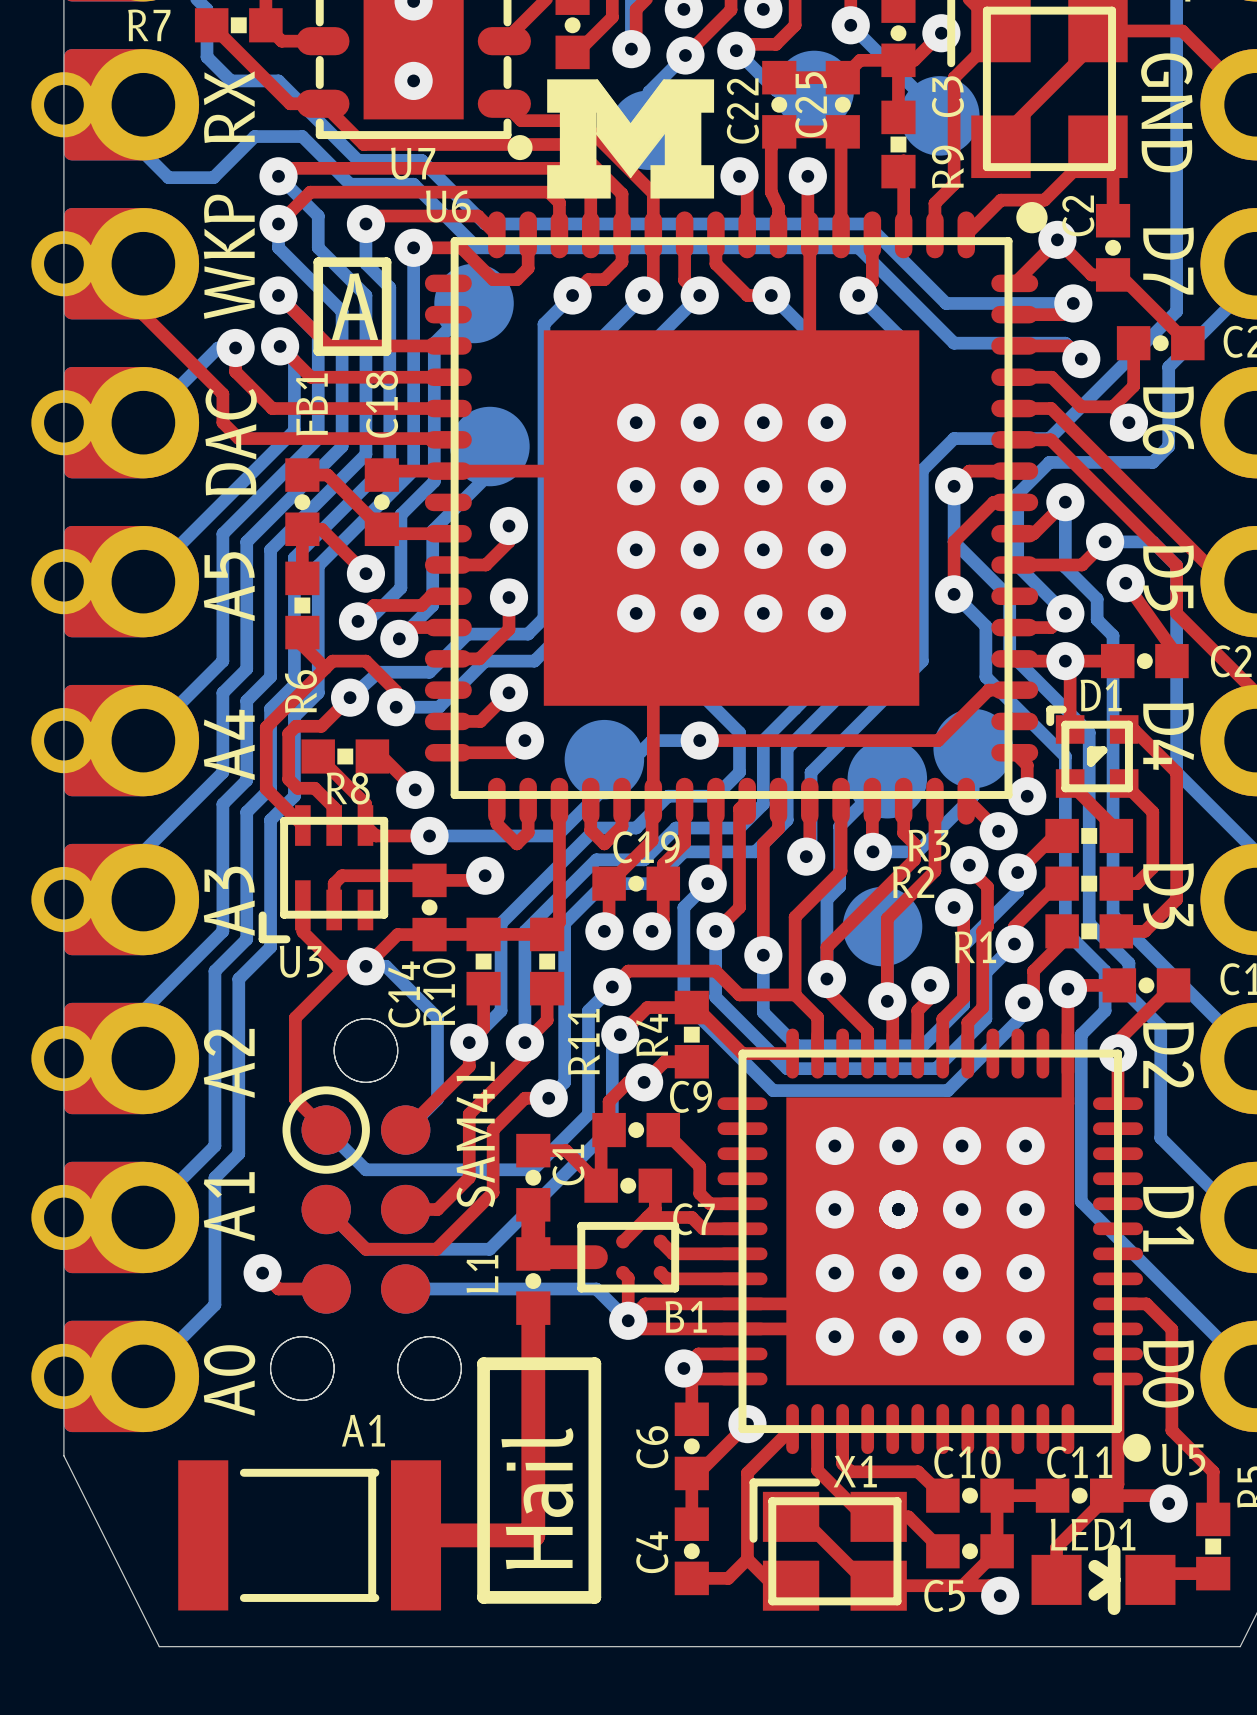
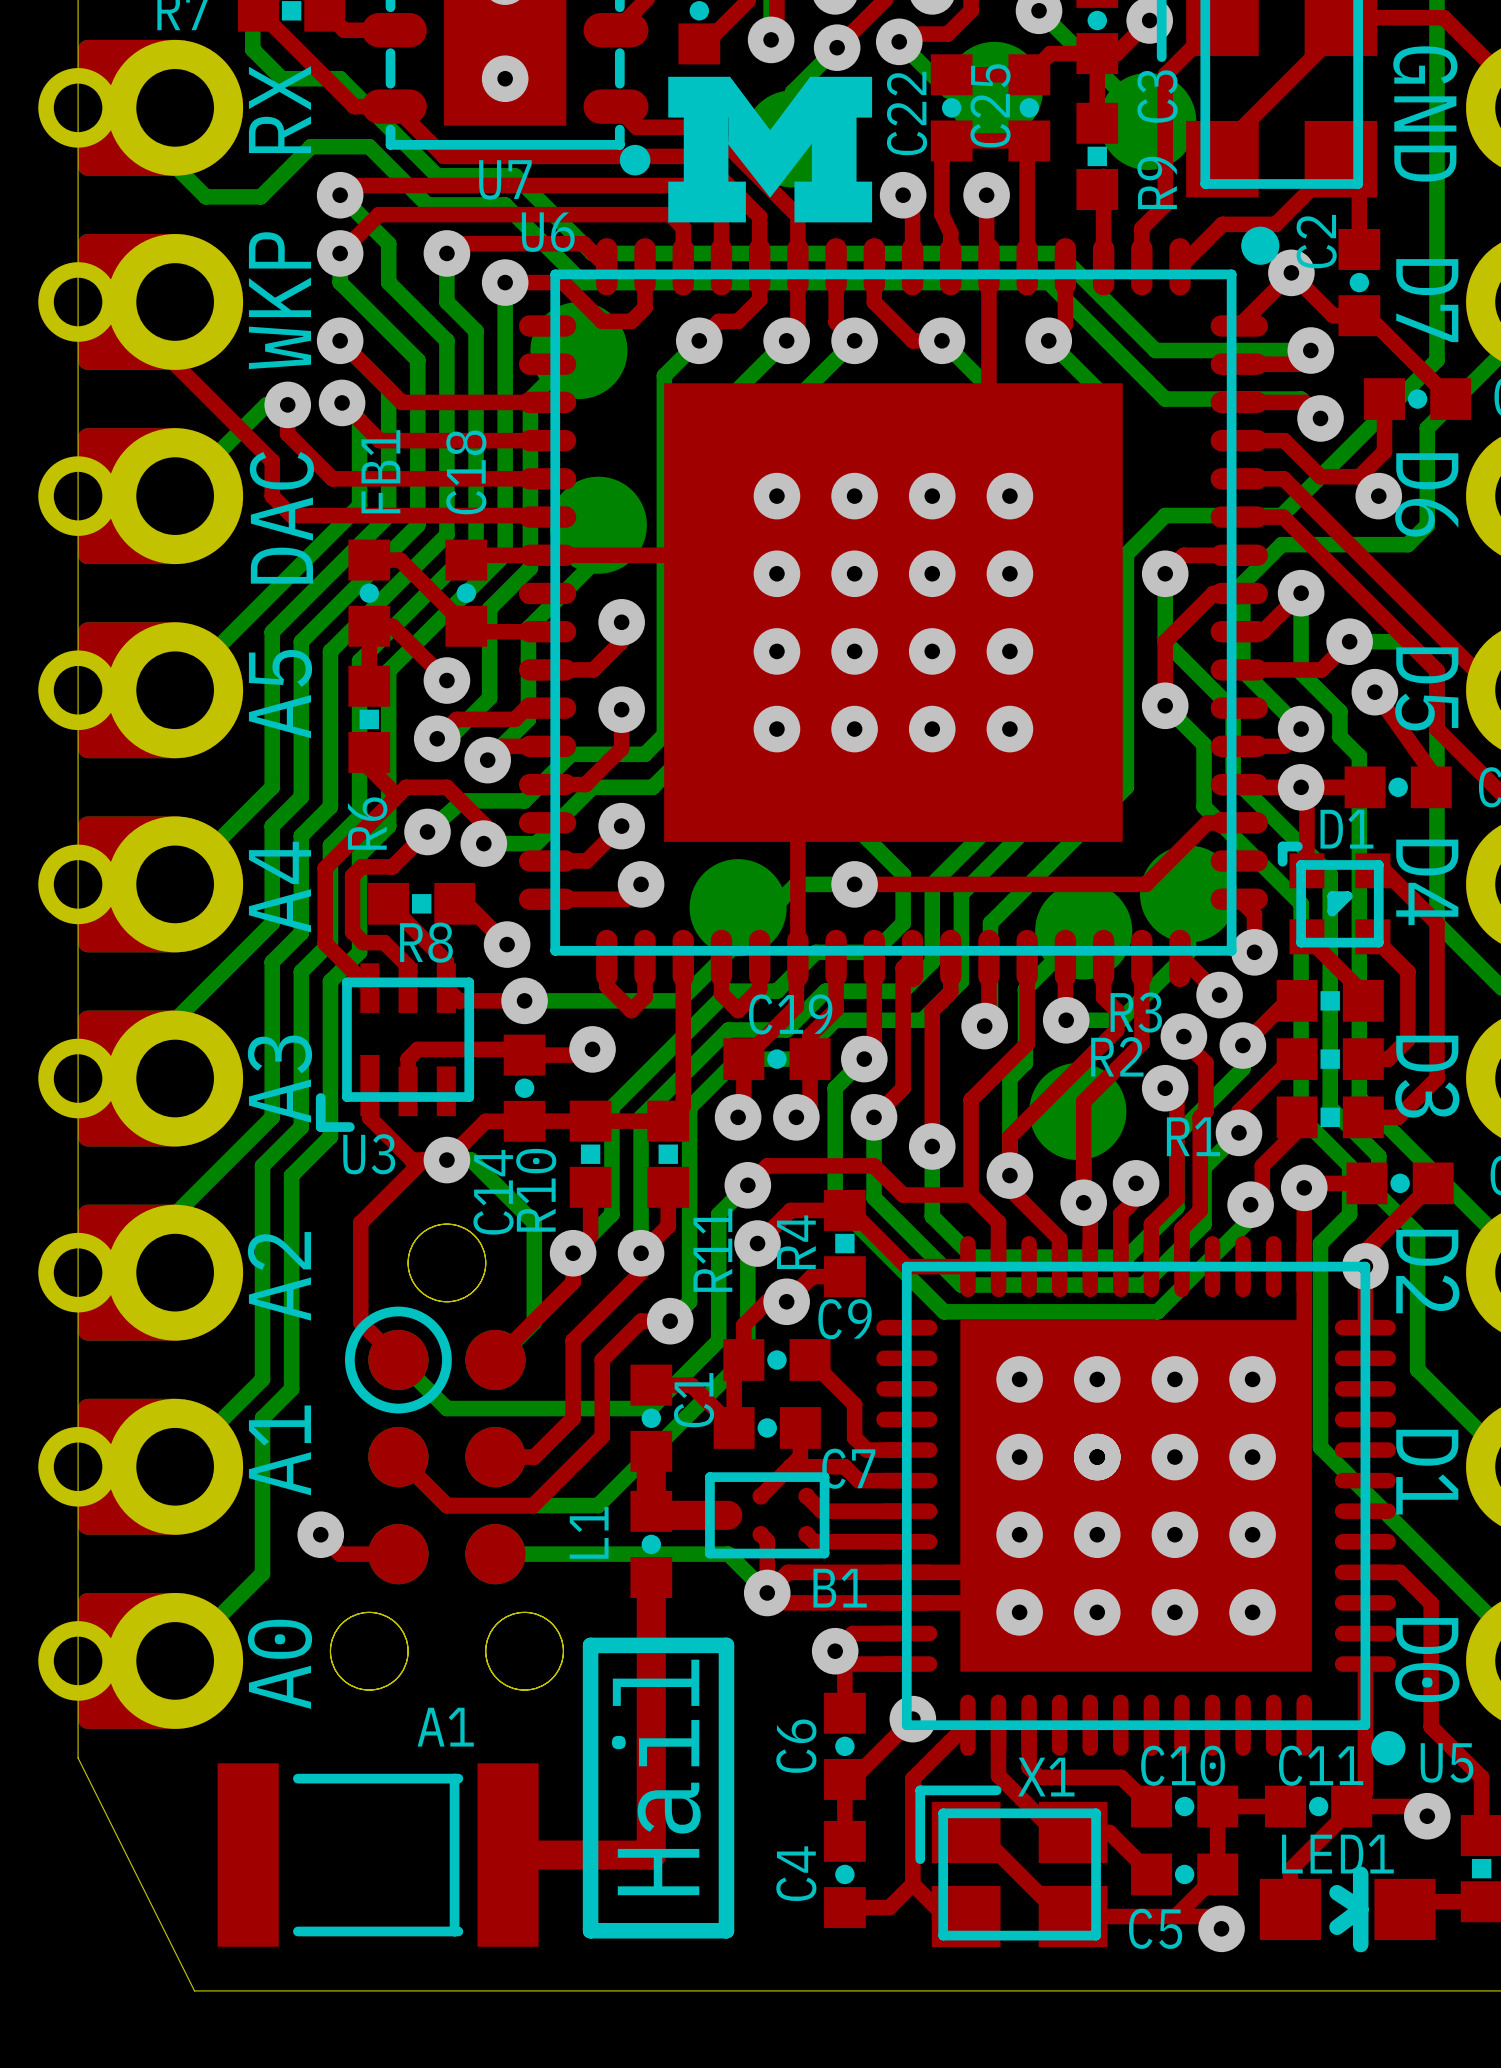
line: (318, 262) (318, 351) (386, 351) (386, 262) (318, 262) -> none
text: A (355, 306) -> none
text: SAM4L (475, 1134) -> none

